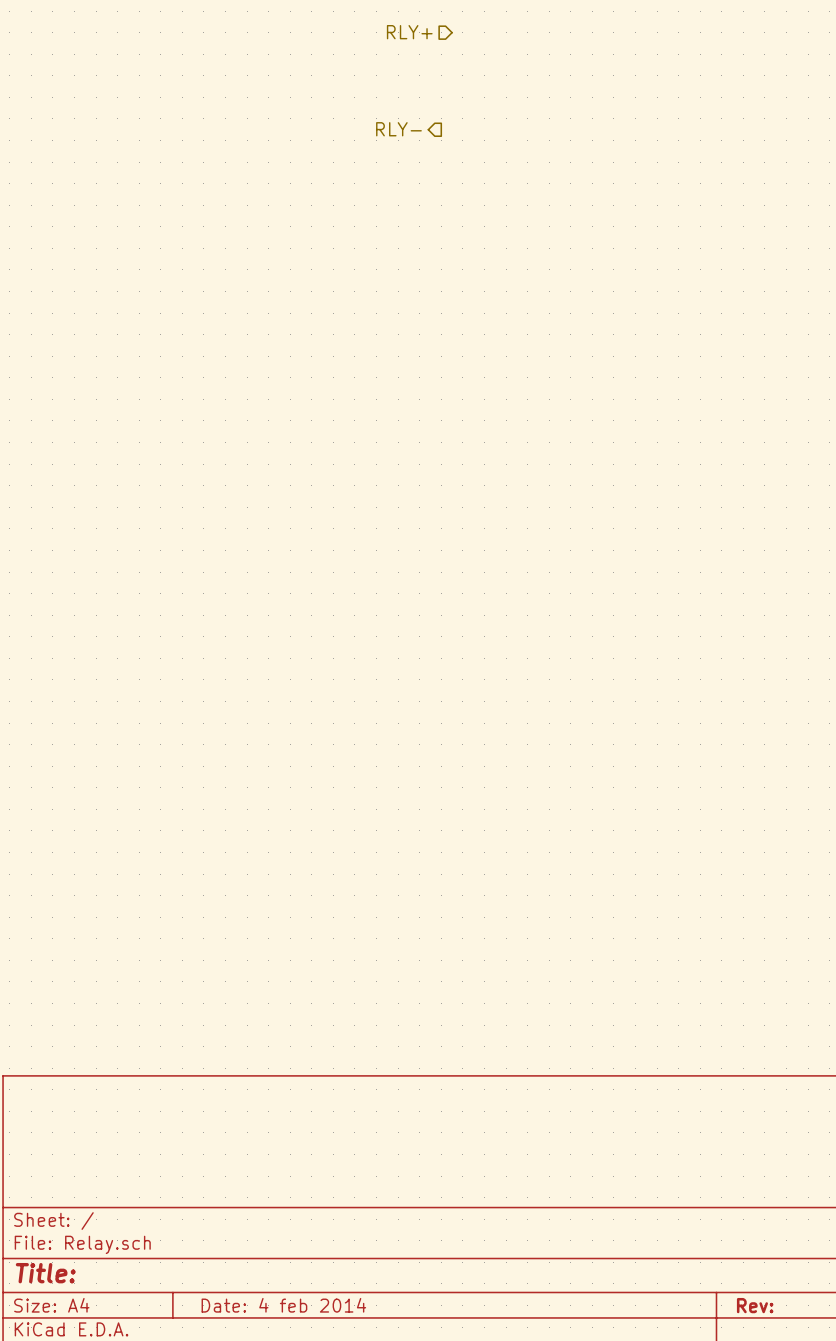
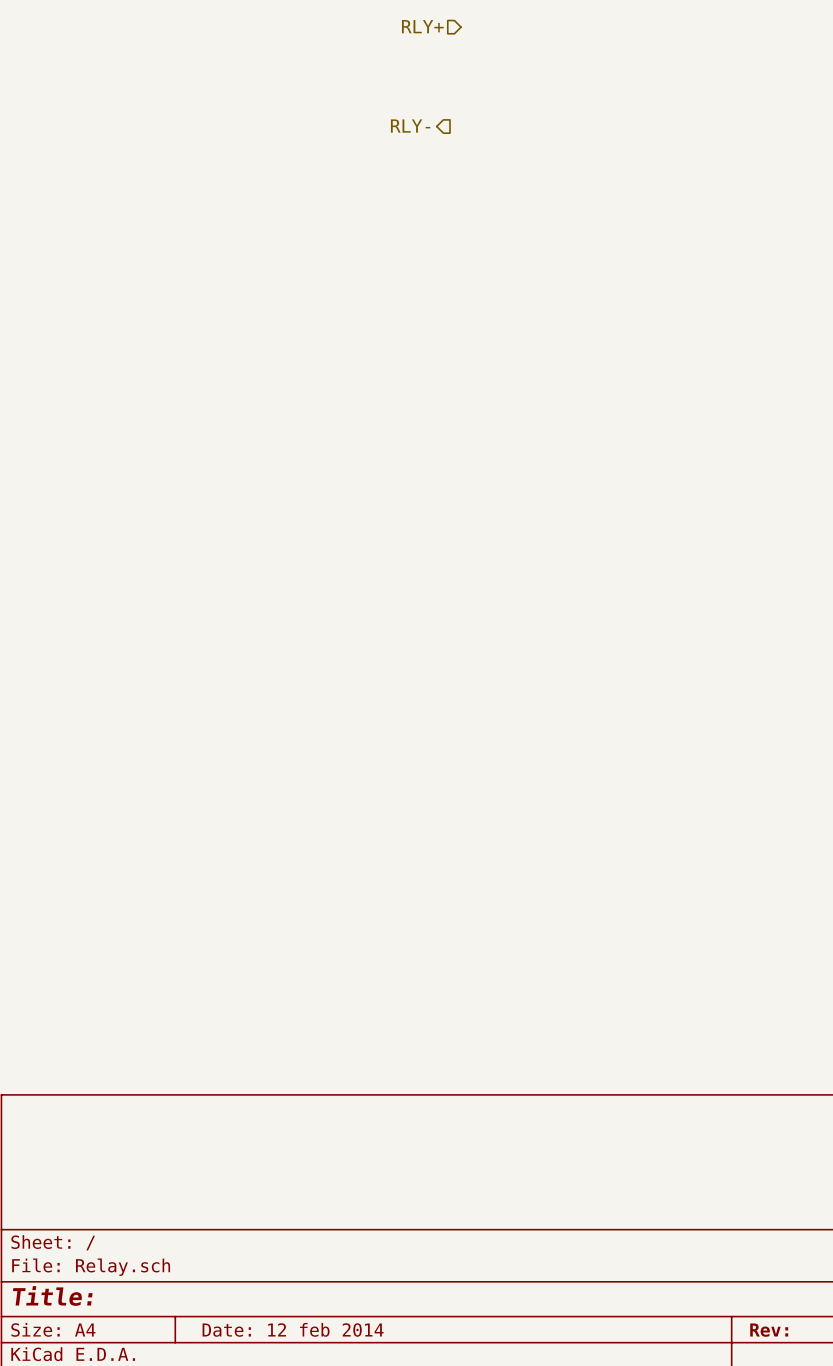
title block: Date: 4 feb 2014 (283, 1305) -> Date: 12 feb 2014 (293, 1329)

